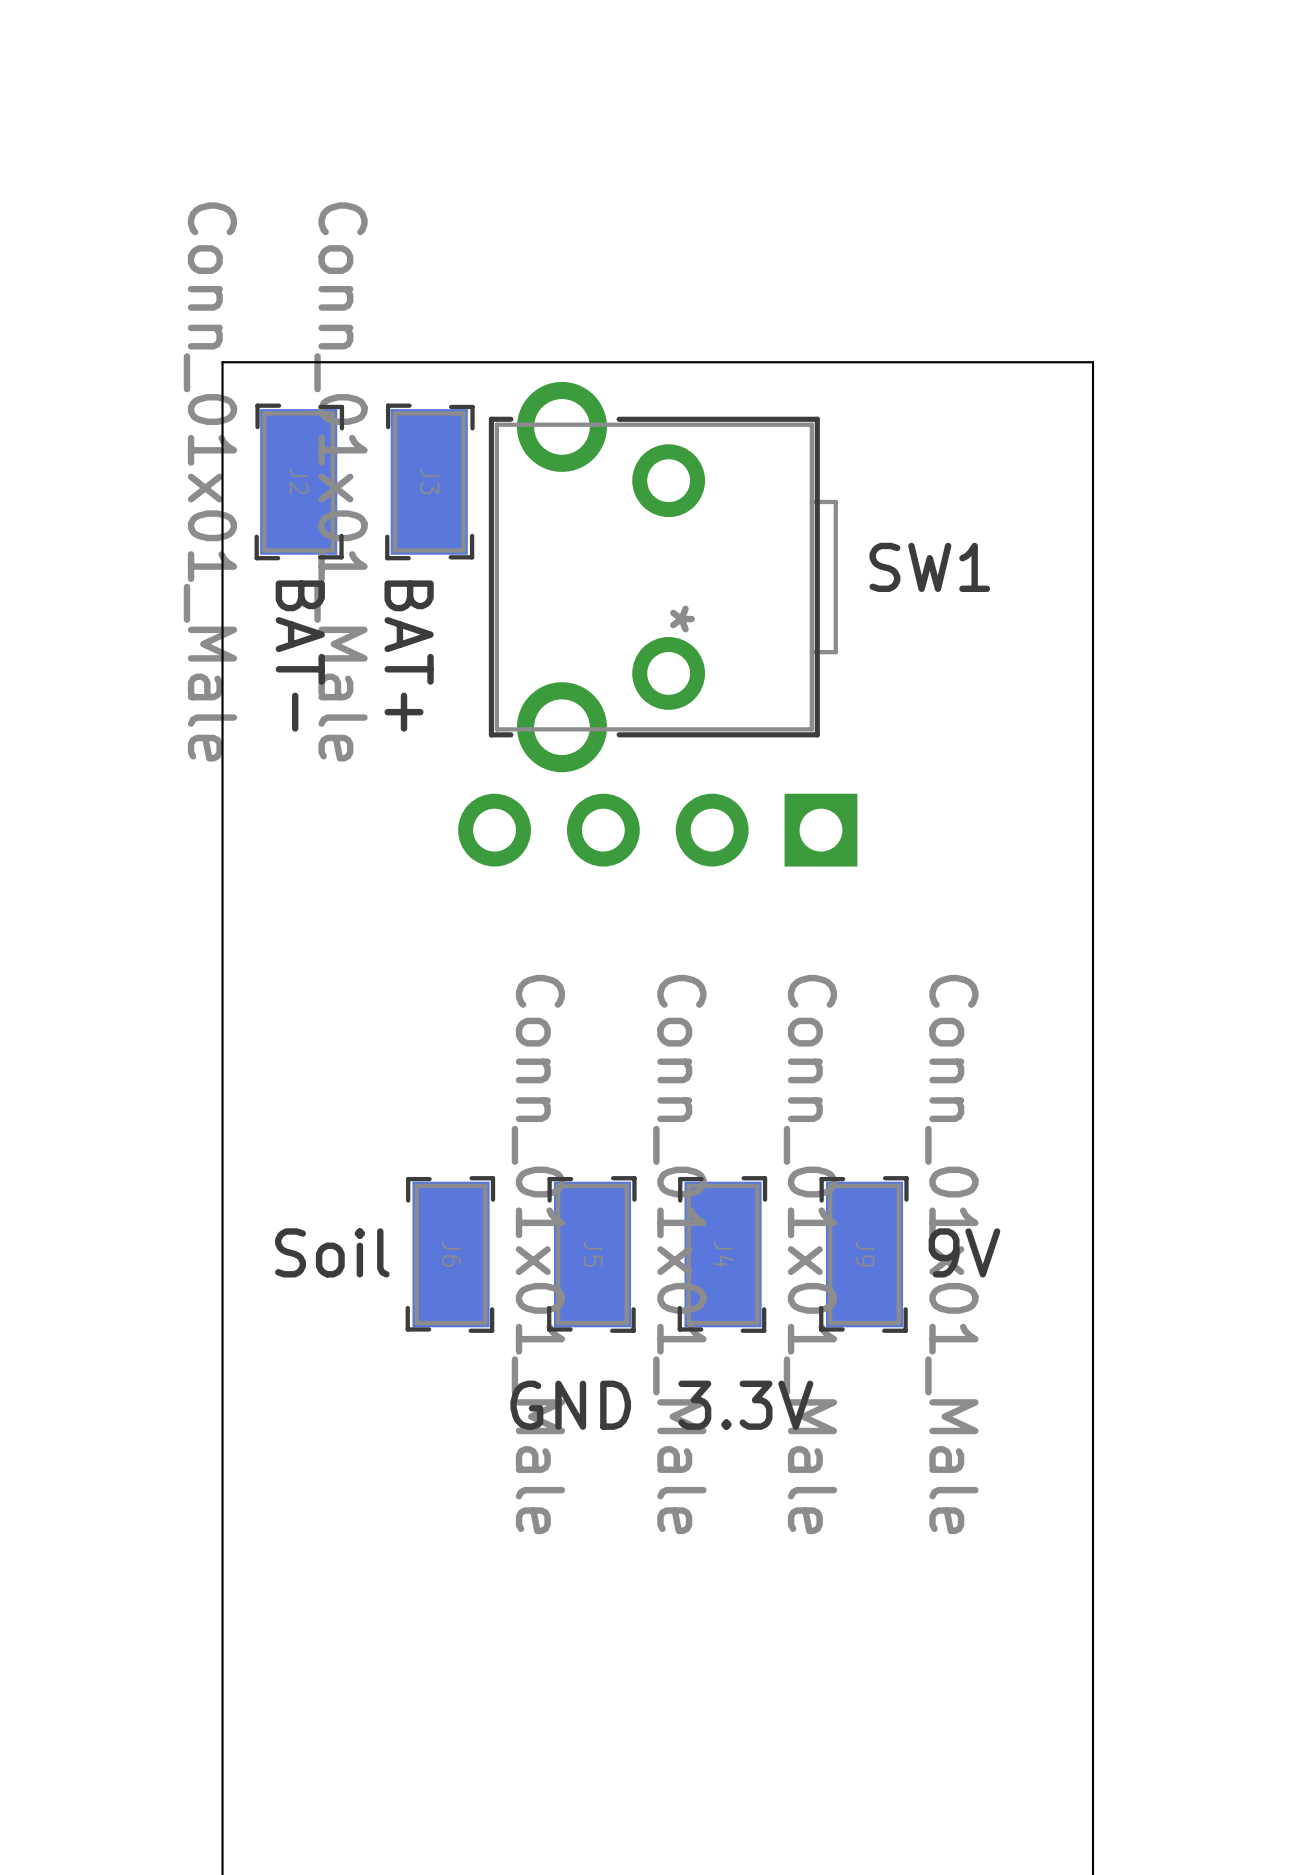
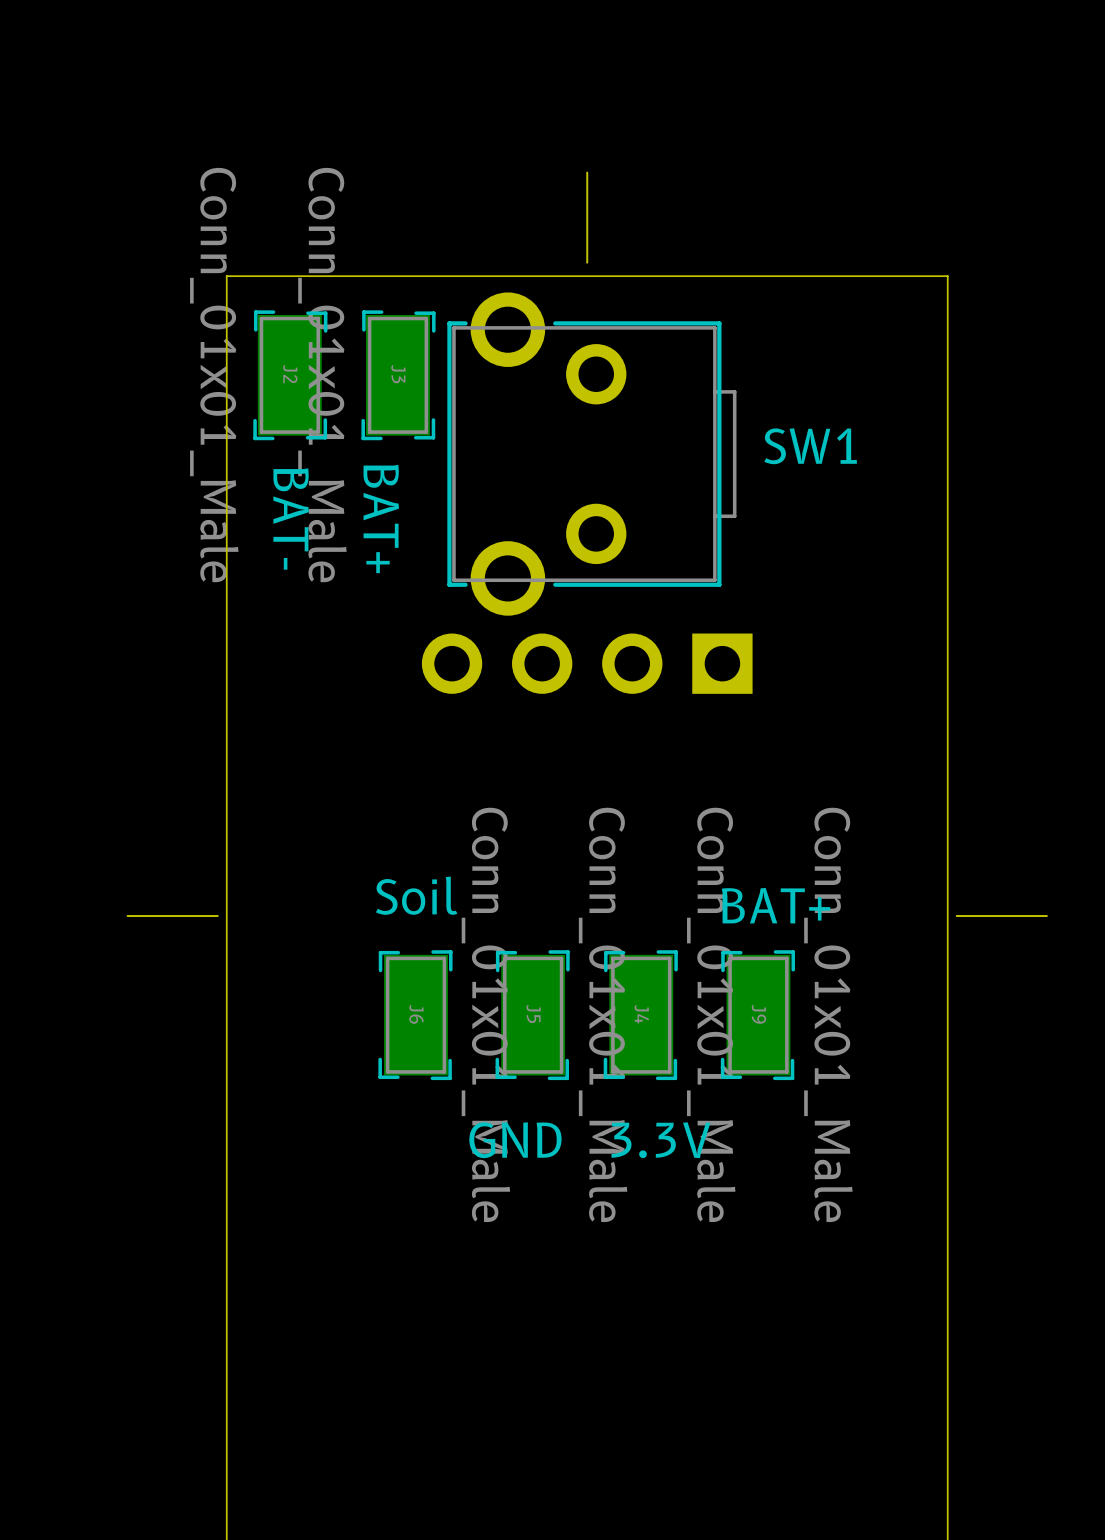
board edge: none -> (587, 172) (587, 262)
SW1 text: * (682, 619) -> none
text: none -> BAT+ (776, 905)
board edge: none -> (217, 916) (127, 916)
board edge: none -> (1046, 916) (956, 916)
text position: Soil (332, 1252) -> Soil (416, 895)
text: 9V (964, 1252) -> none

